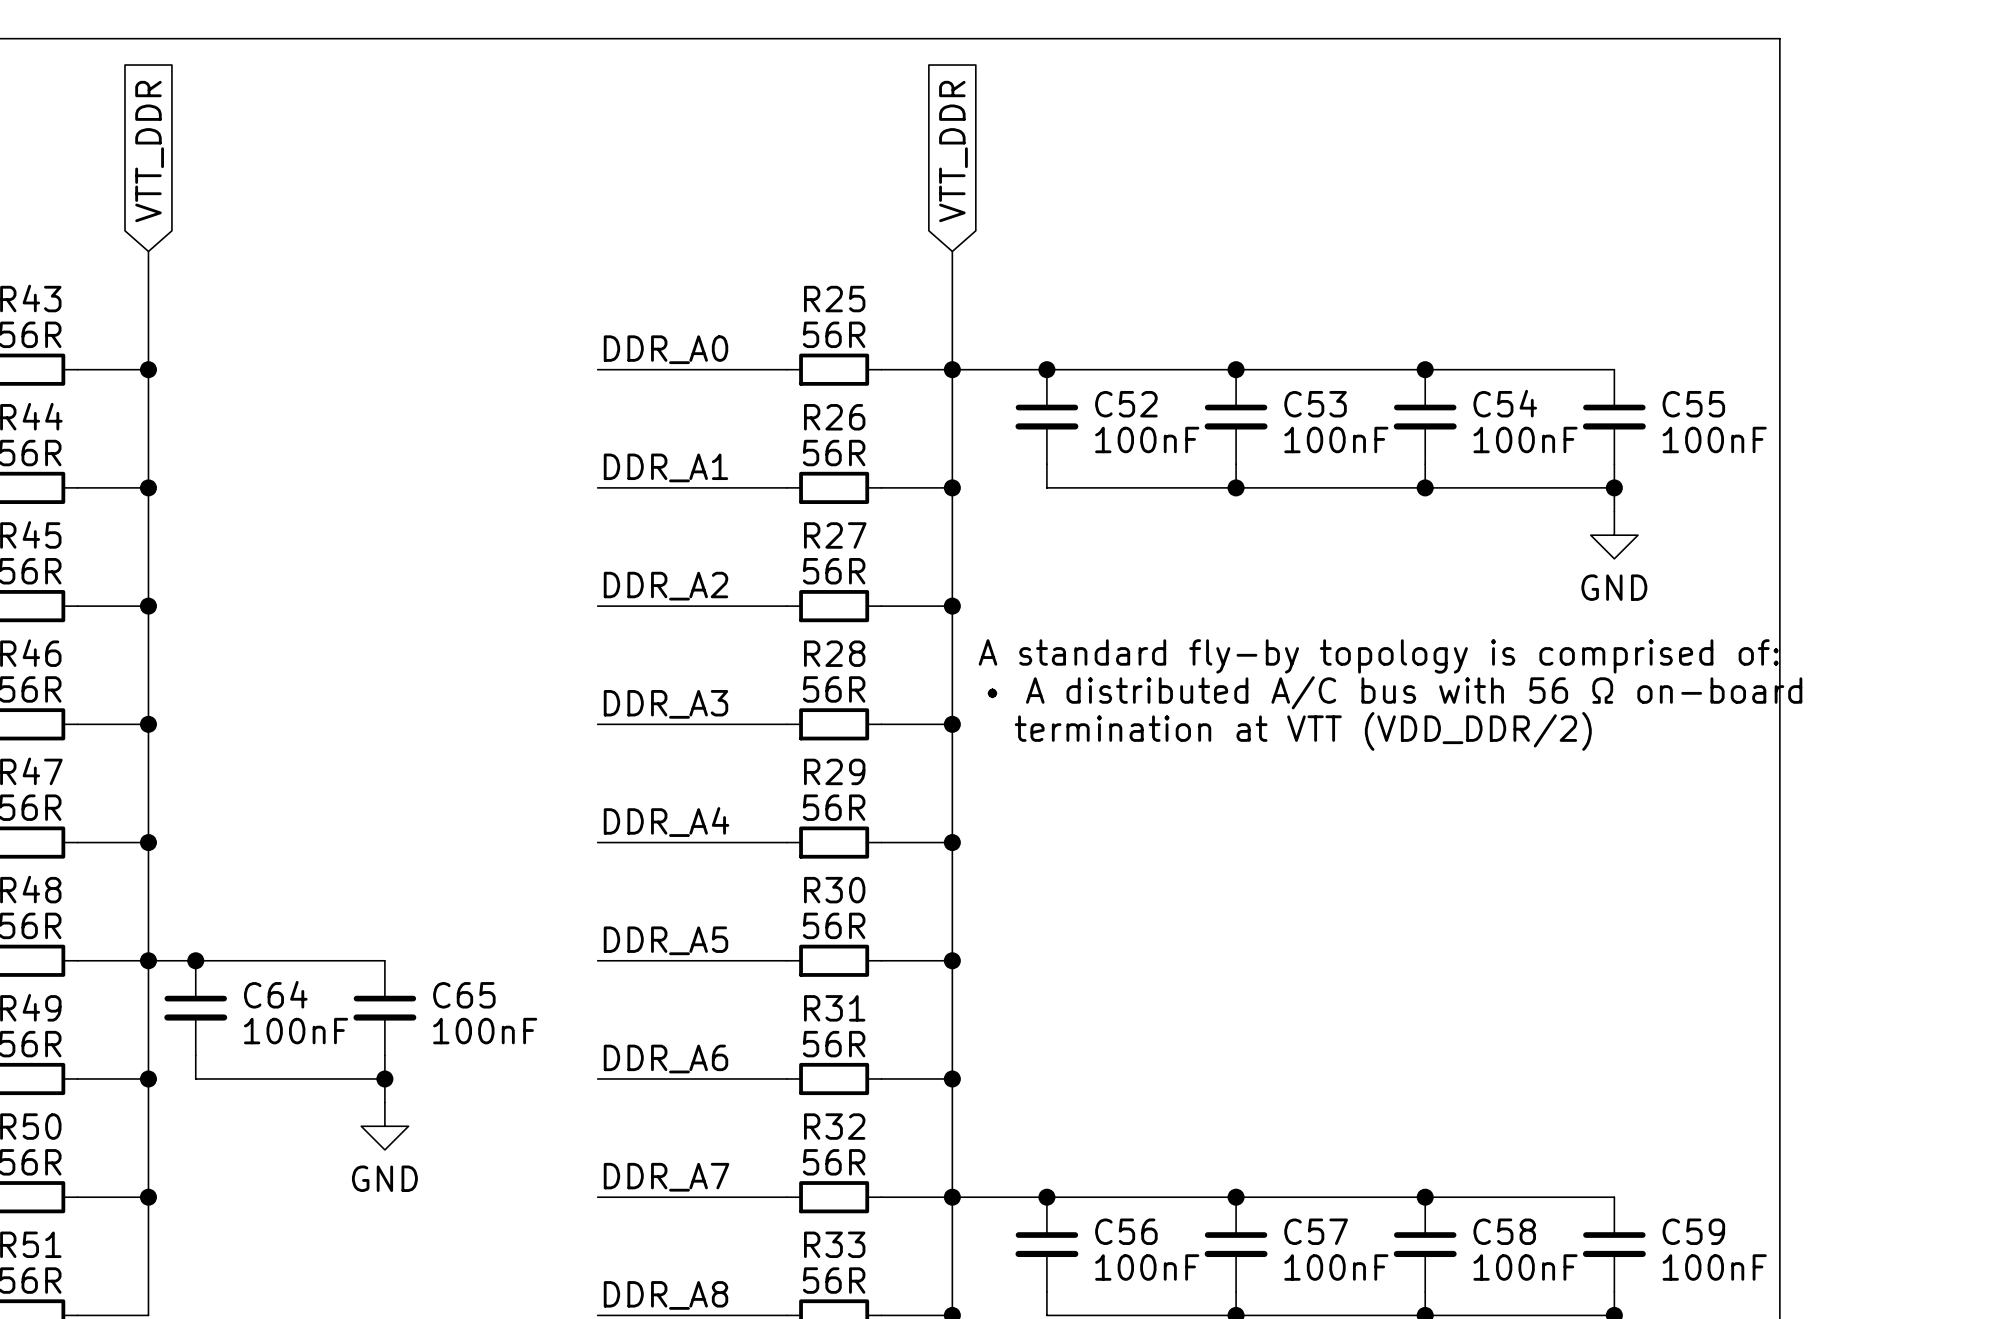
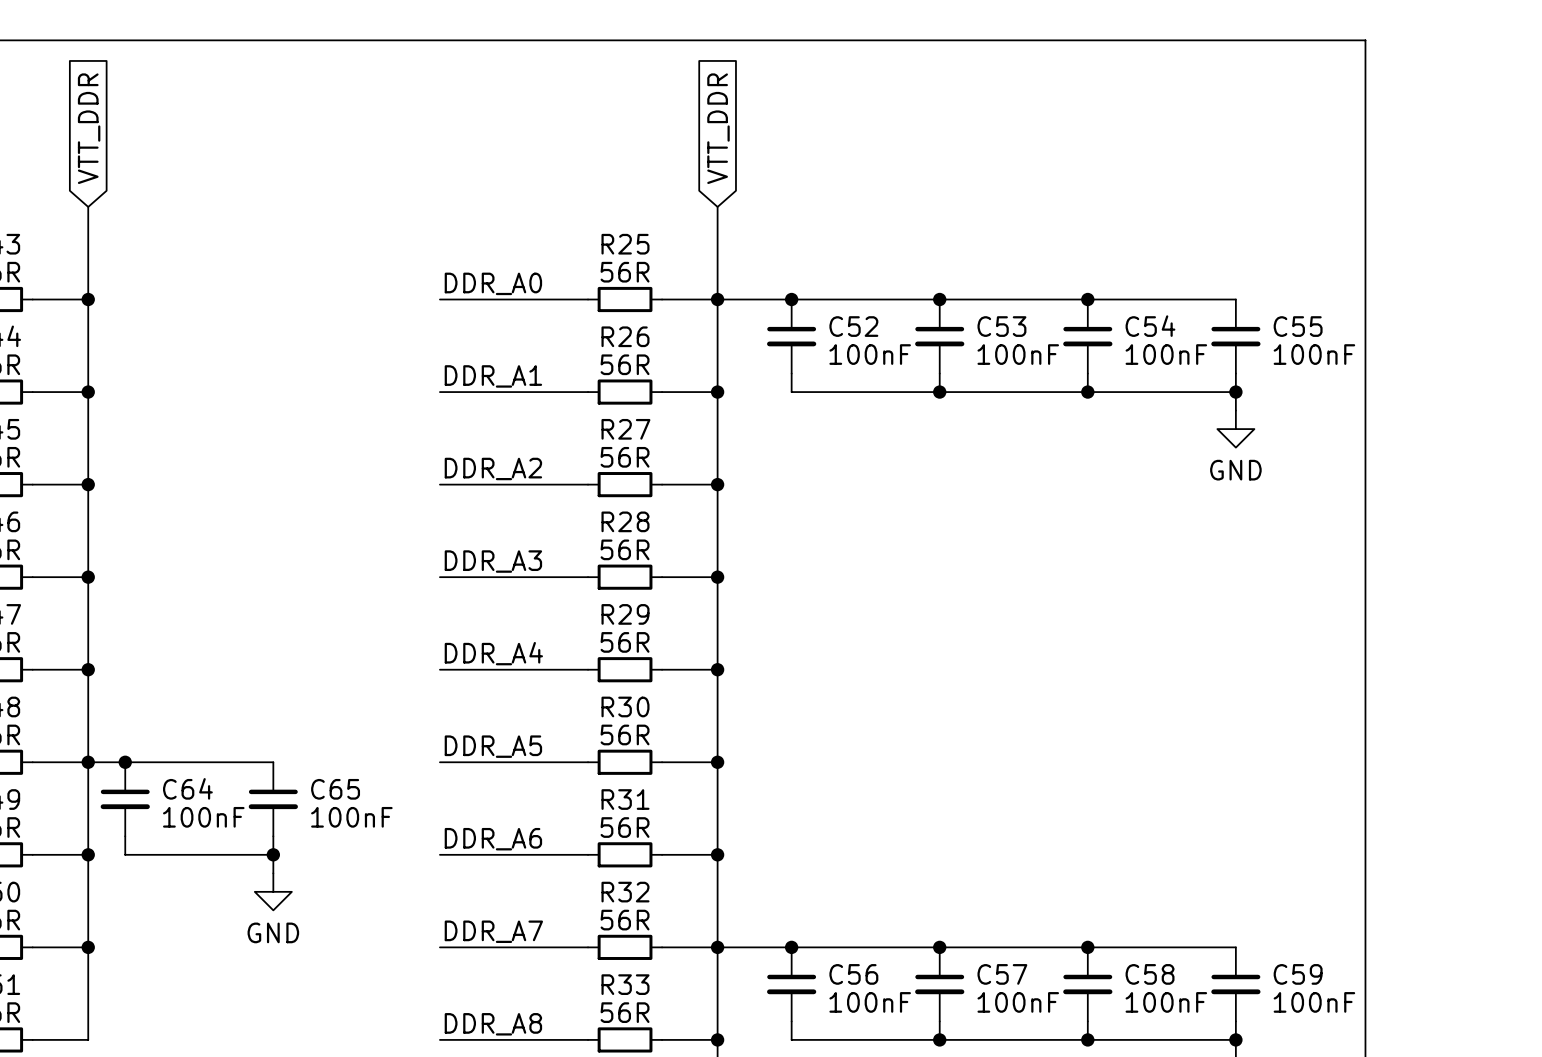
text: A standard fly-by topology is comprised of: (1378, 656) -> none
text: • A distributed A/C bus with 56 Ω on-board (1395, 692) -> none
text: termination at VTT (VDD_DDR/2) (1303, 731) -> none

